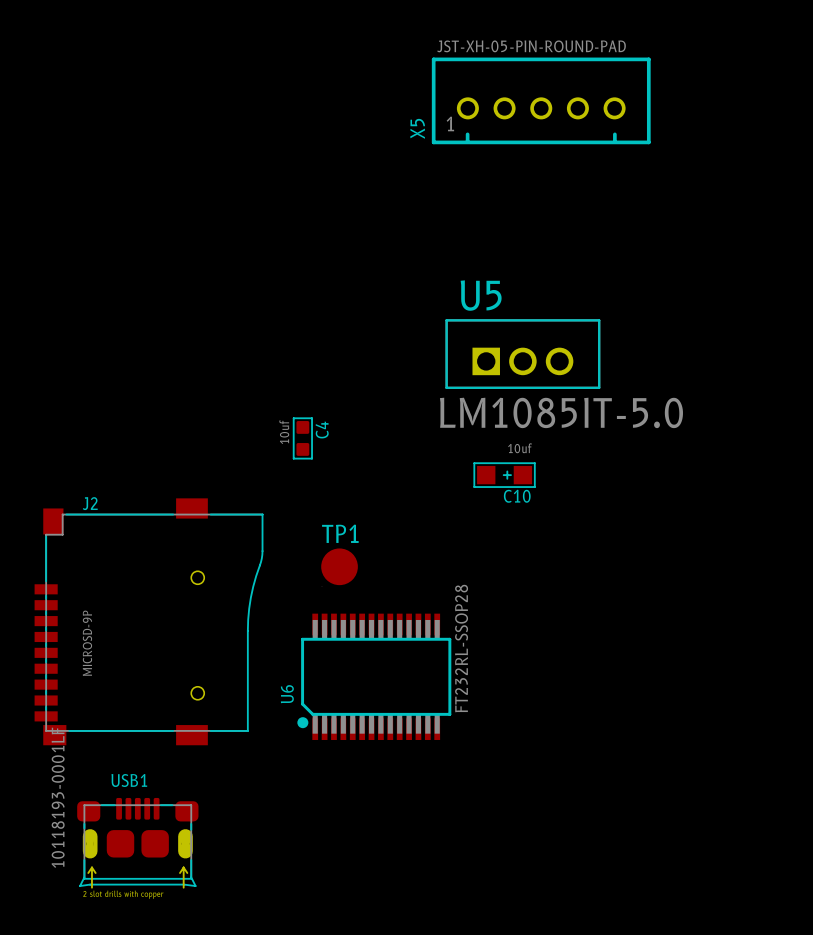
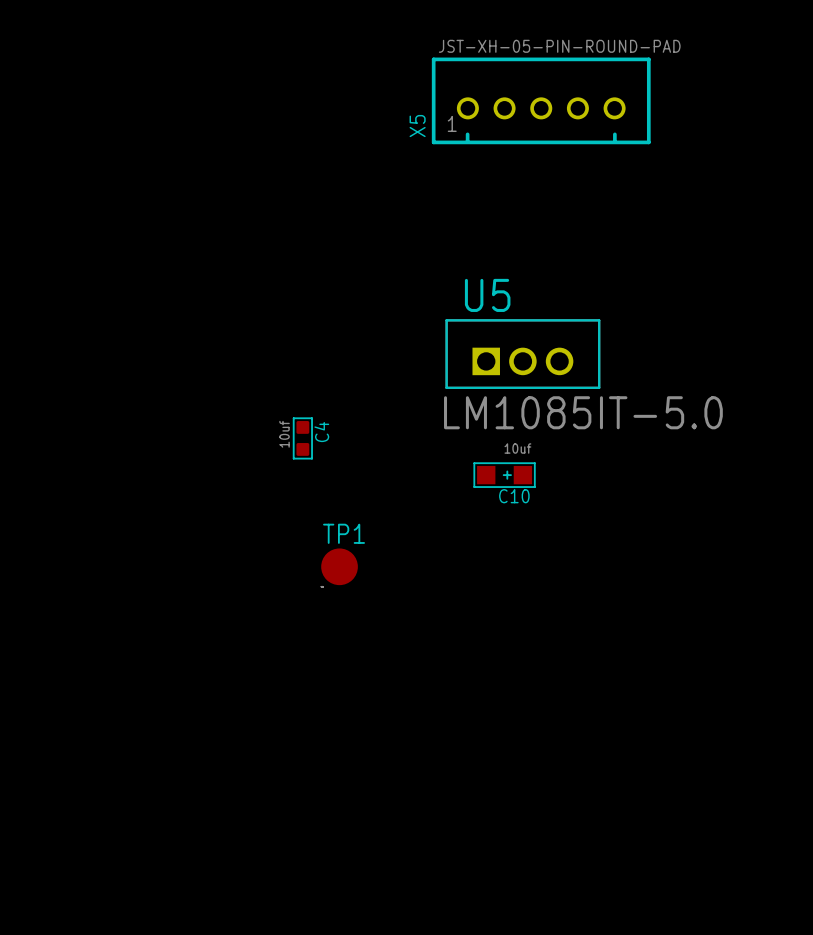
J2: MICROSD-9P (149, 621) -> none
U6: FT232RL-SSOP28 (374, 676) -> none
USB1: 10118193-0001LF (137, 843) -> none

